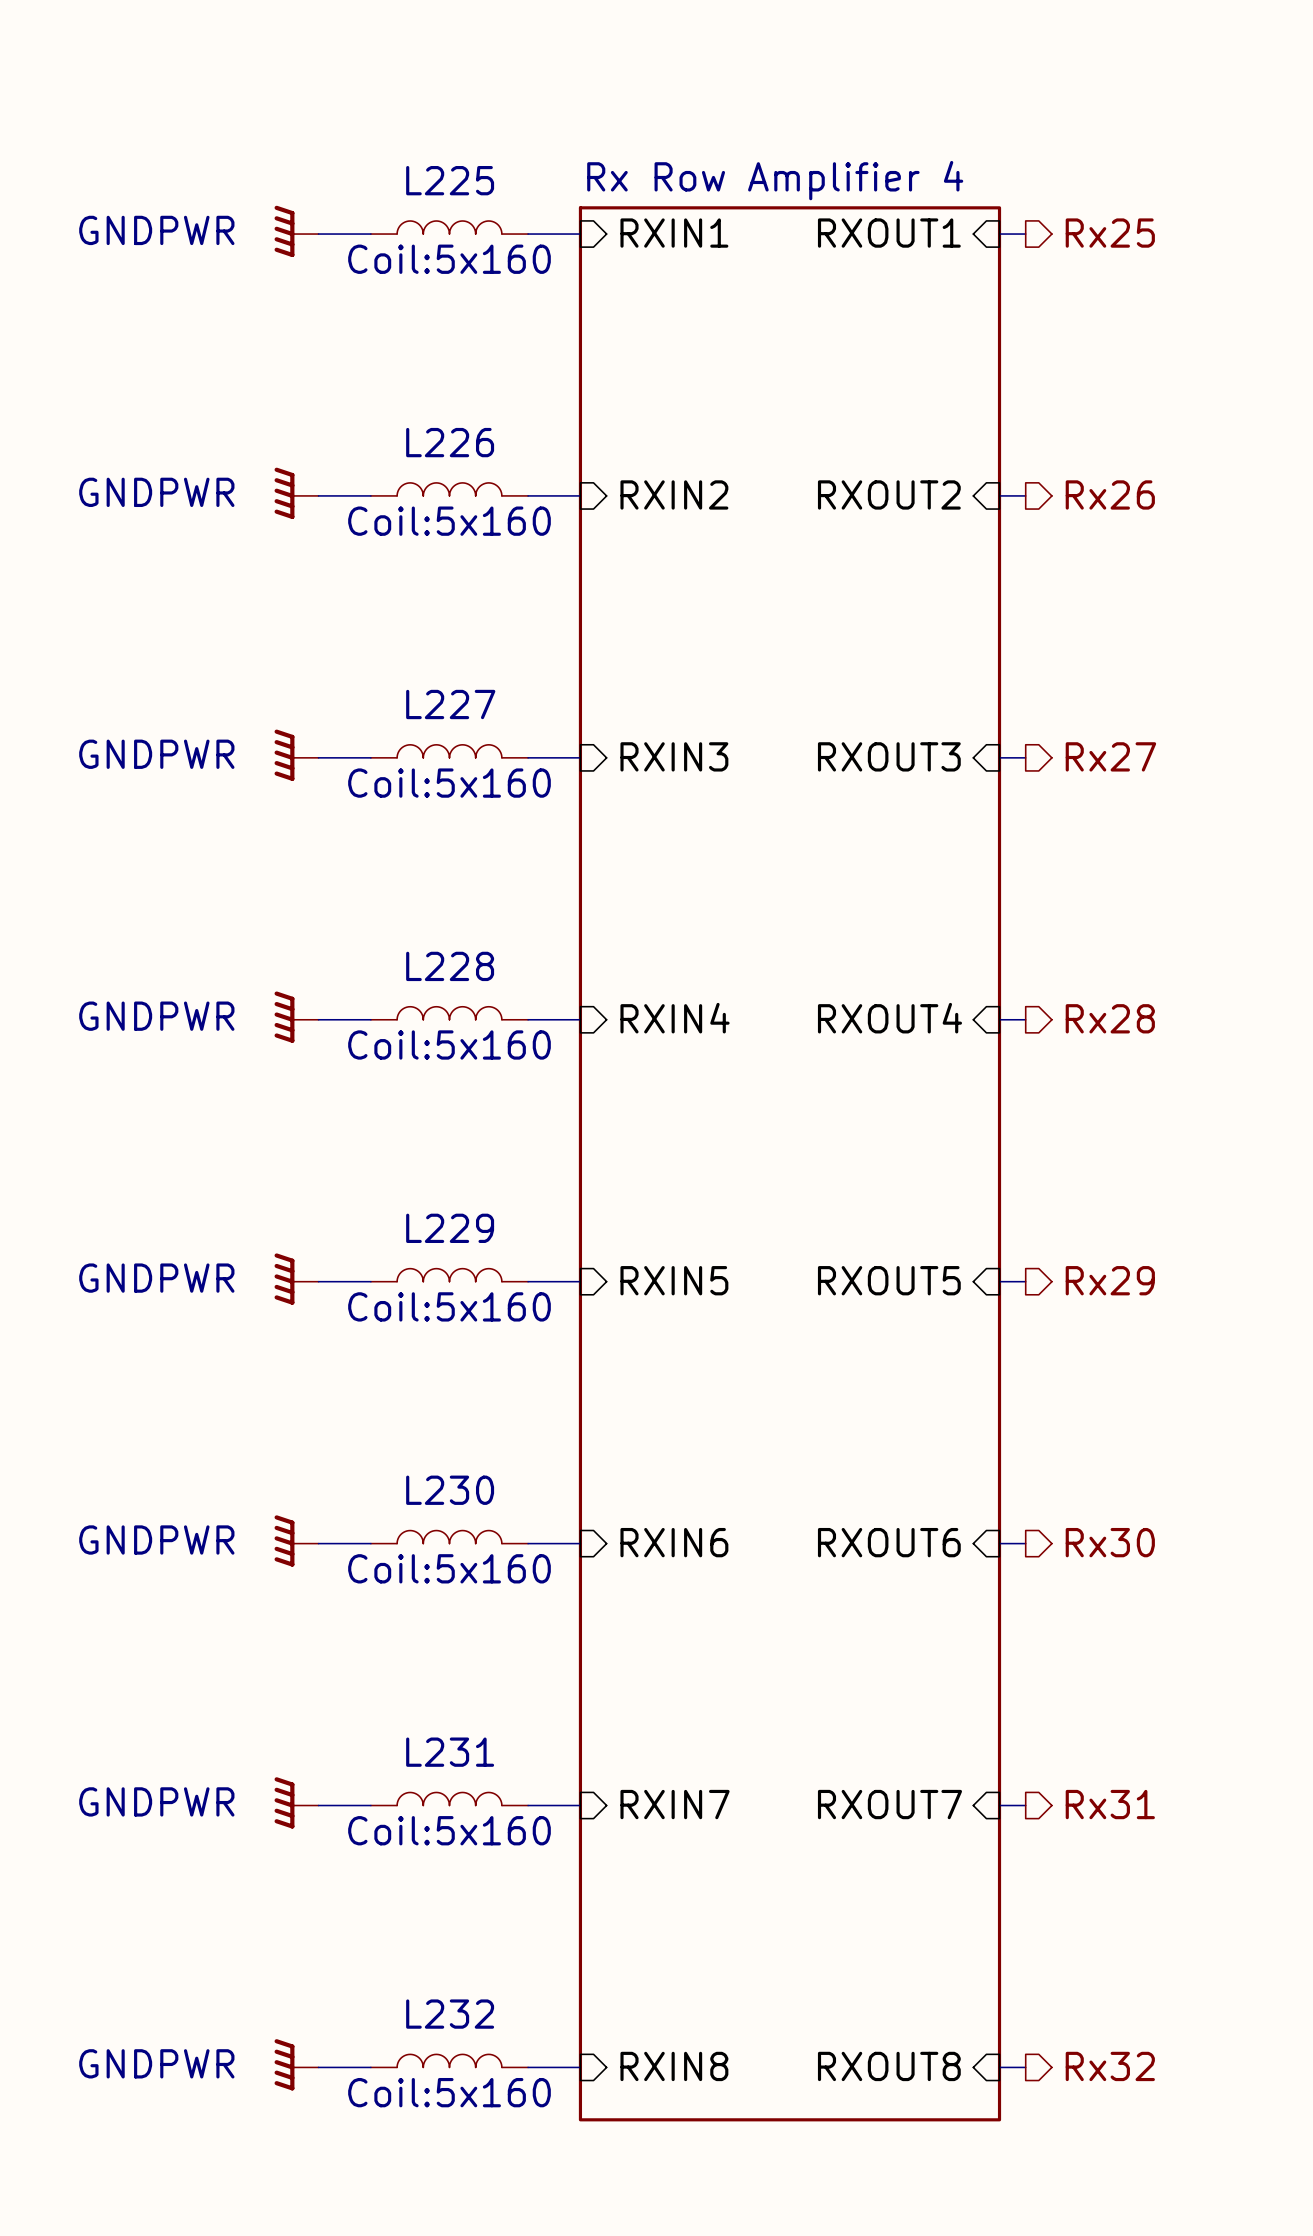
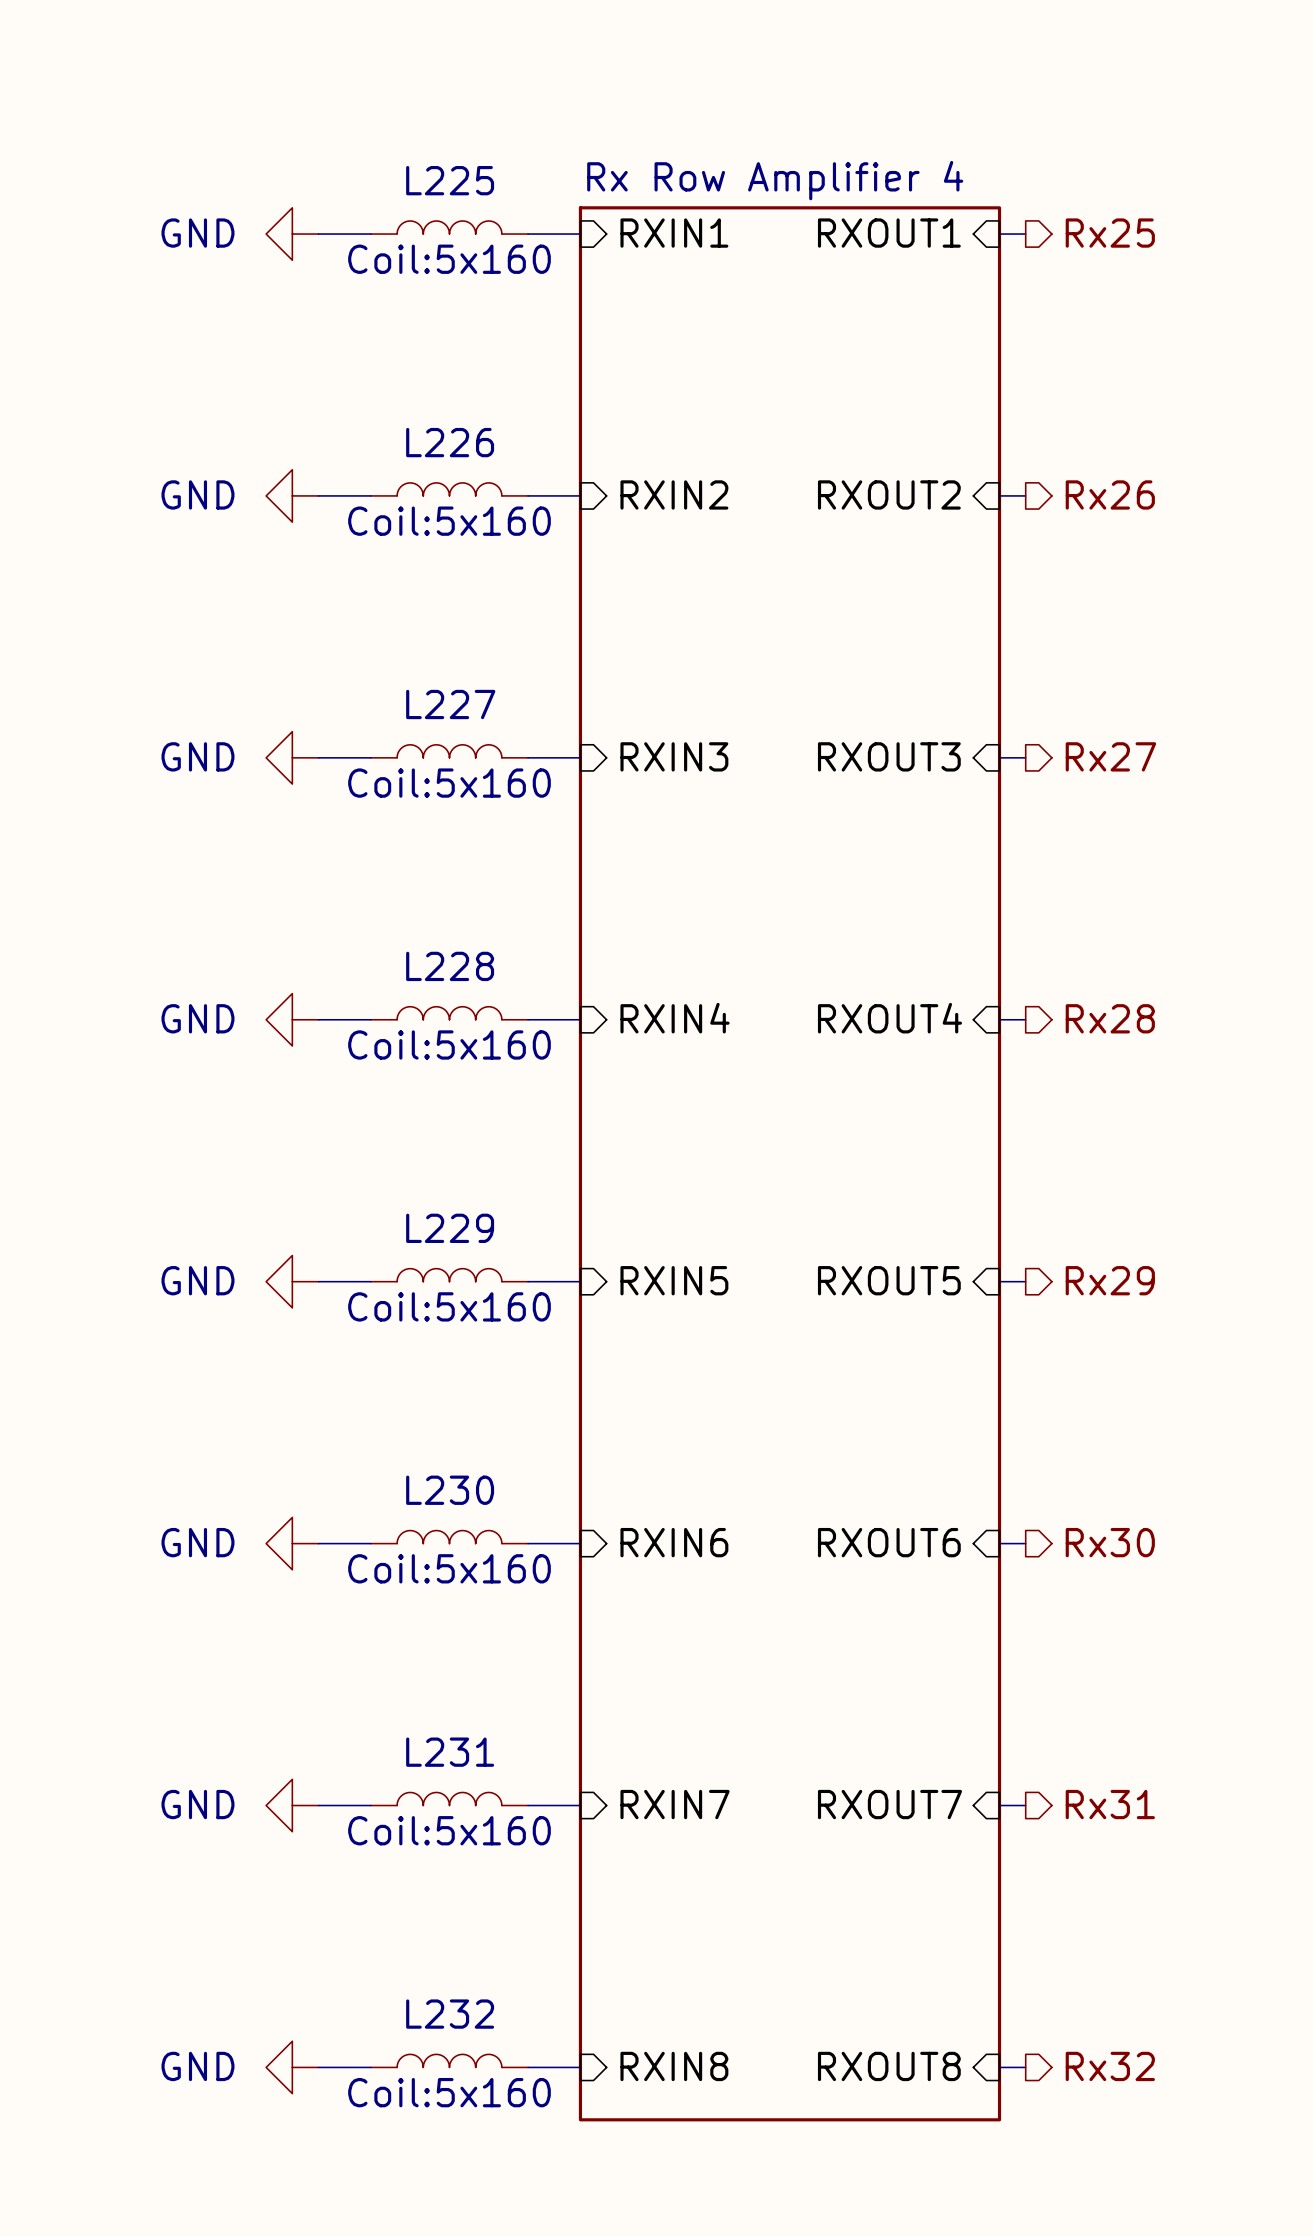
power symbol: GNDPWR (296, 231) -> GND (292, 234)
power symbol: GNDPWR (296, 493) -> GND (292, 495)
power symbol: GNDPWR (296, 755) -> GND (292, 757)
power symbol: GNDPWR (296, 1017) -> GND (292, 1019)
power symbol: GNDPWR (296, 1279) -> GND (292, 1281)
power symbol: GNDPWR (296, 1540) -> GND (292, 1543)
power symbol: GNDPWR (296, 1802) -> GND (292, 1805)
power symbol: GNDPWR (296, 2064) -> GND (292, 2067)

